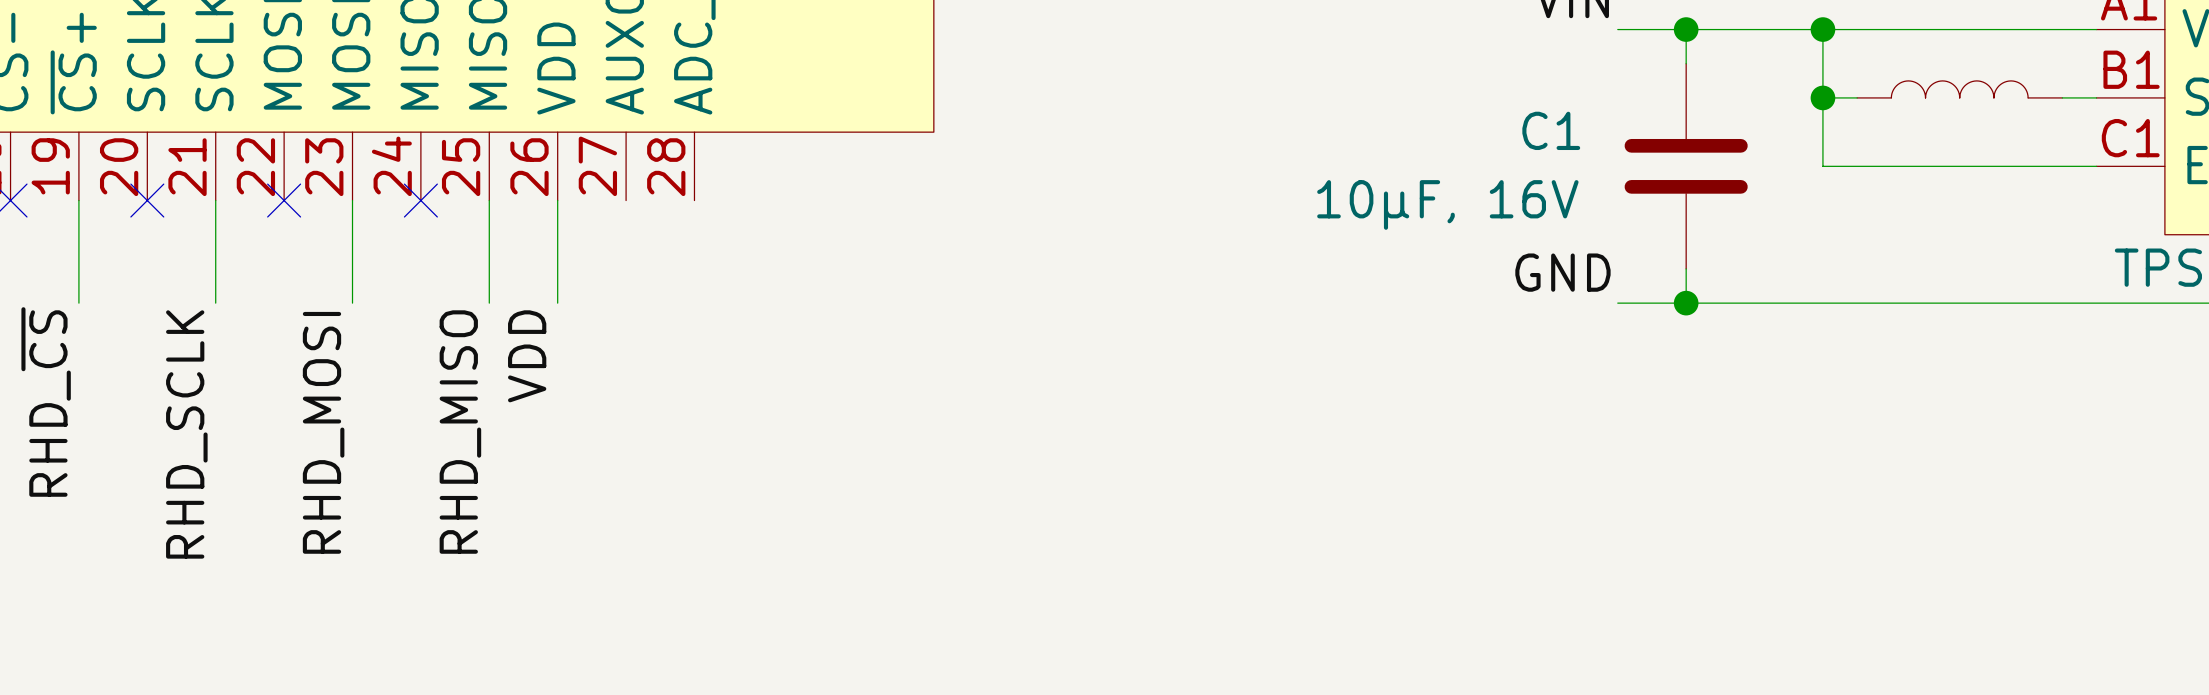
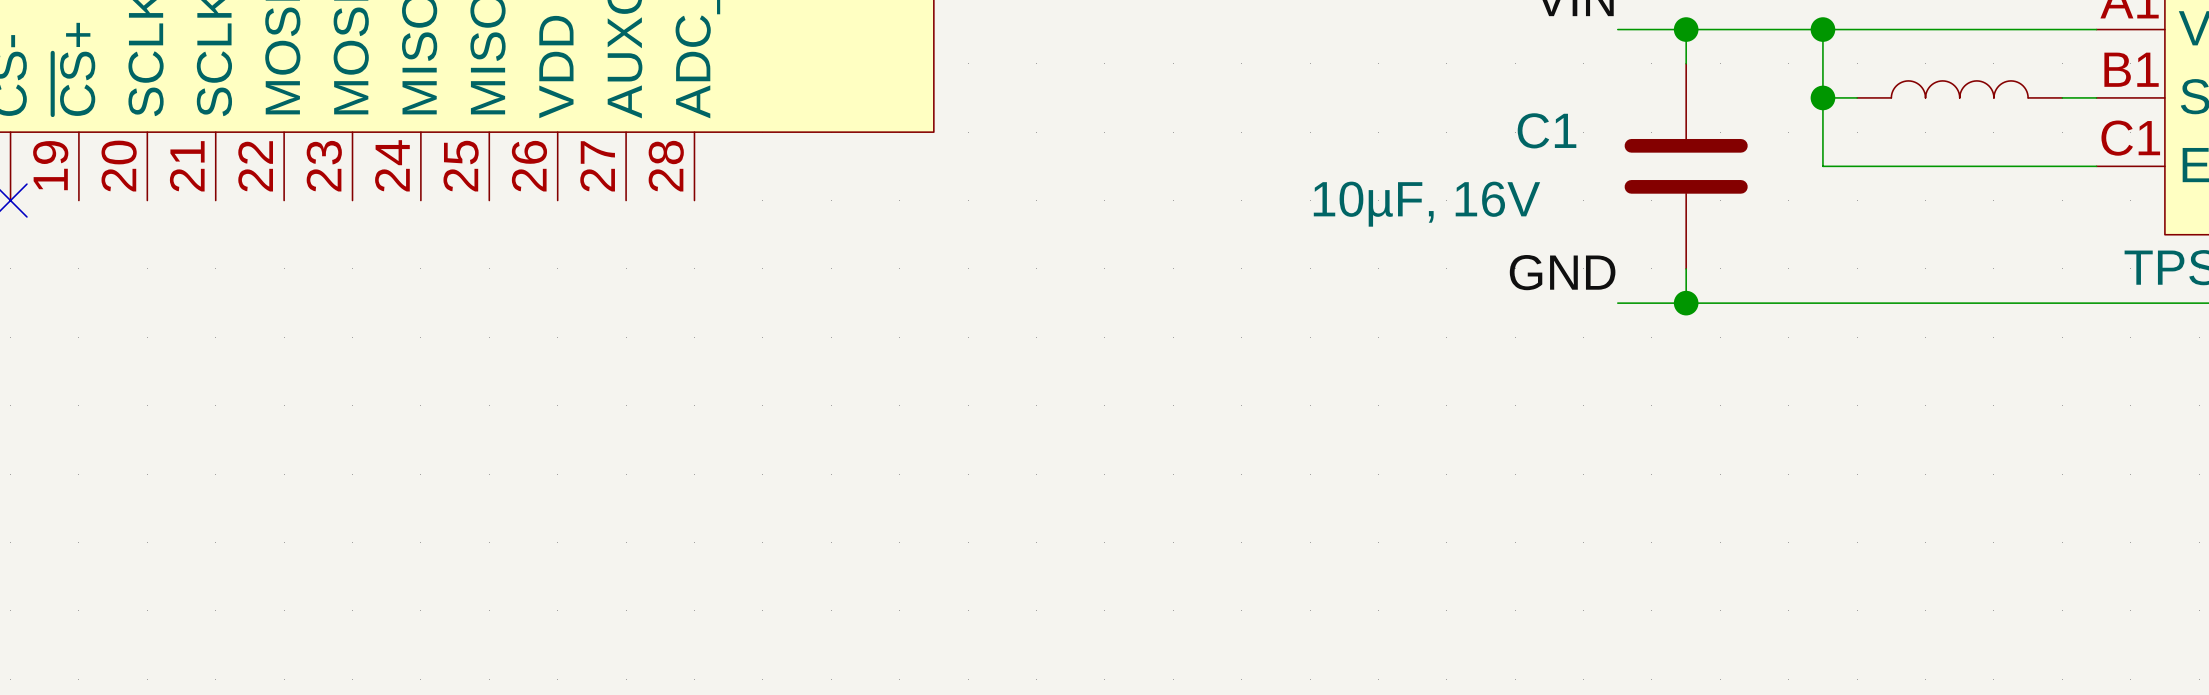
wire: (78, 200) (78, 303) -> none
no-connect mark: (147, 200) -> none
wire: (215, 200) (215, 303) -> none
no-connect mark: (284, 200) -> none
wire: (352, 200) (352, 303) -> none
no-connect mark: (420, 200) -> none
wire: (489, 200) (489, 303) -> none
wire: (557, 200) (557, 303) -> none
label: VDD (527, 356) -> none
label: RHD_~{CS} (46, 401) -> none
label: RHD_MOSI (323, 432) -> none
label: RHD_MISO (460, 432) -> none
label: RHD_SCLK (186, 434) -> none

